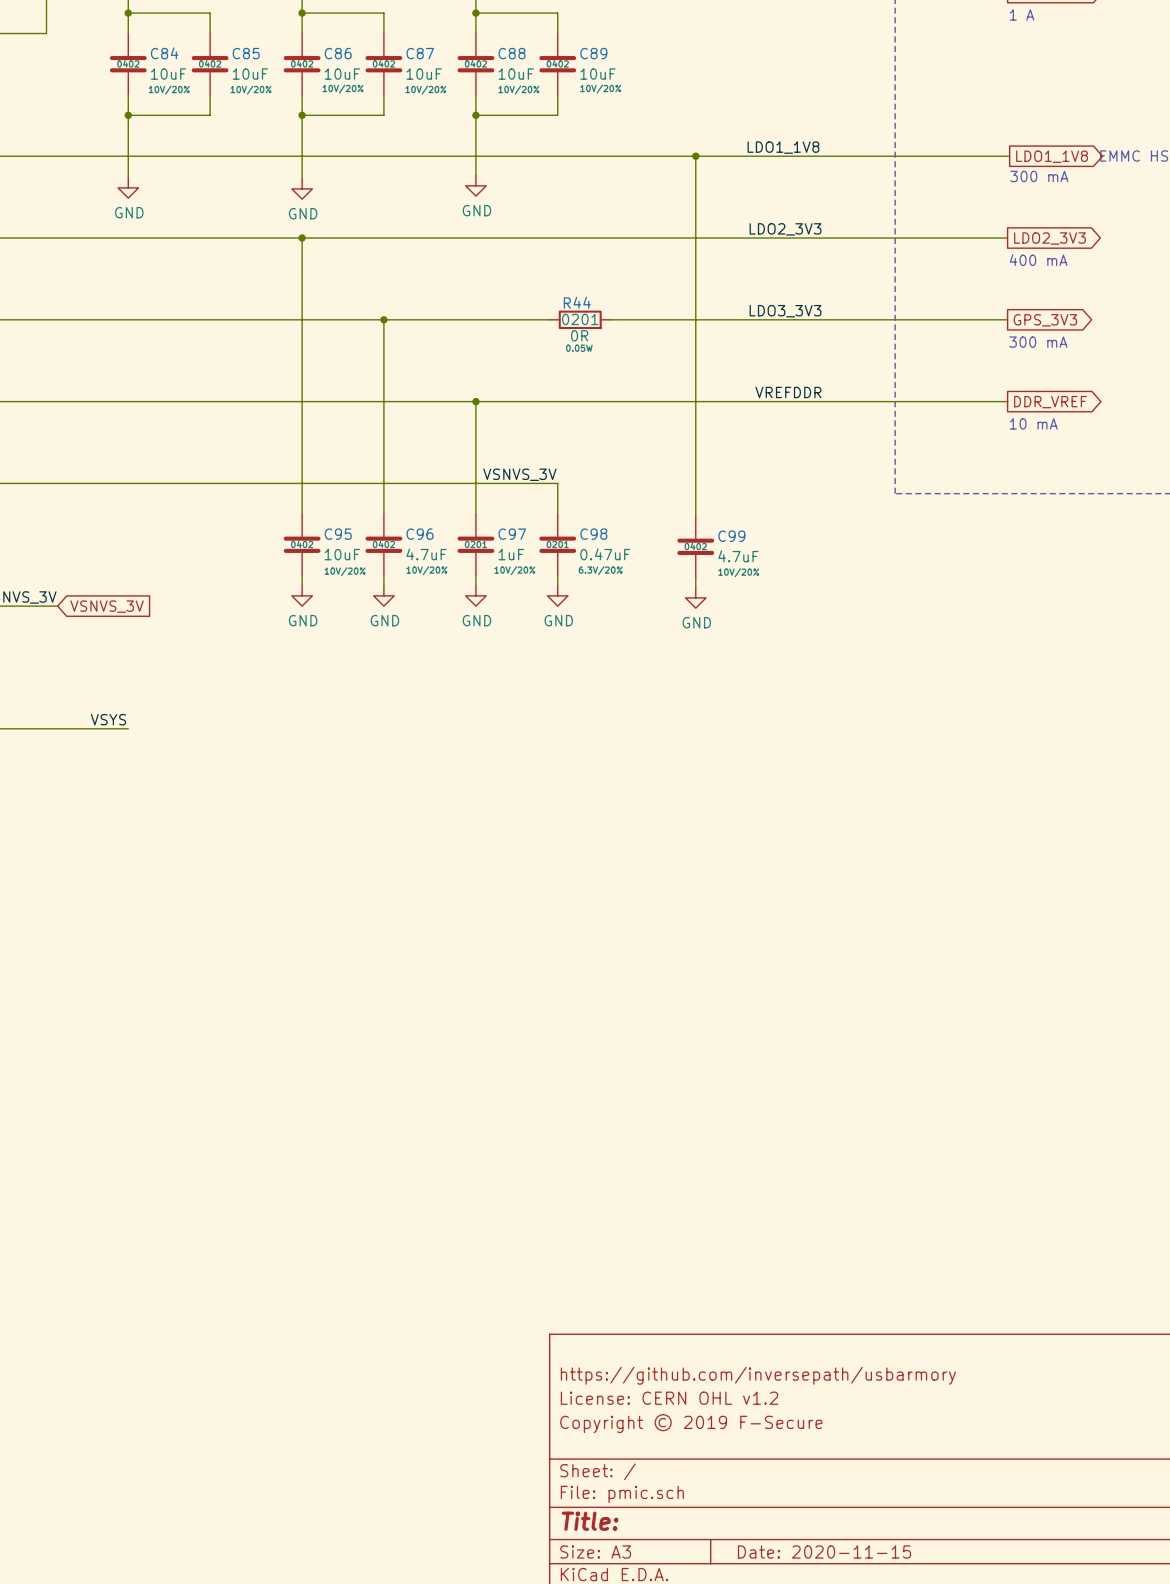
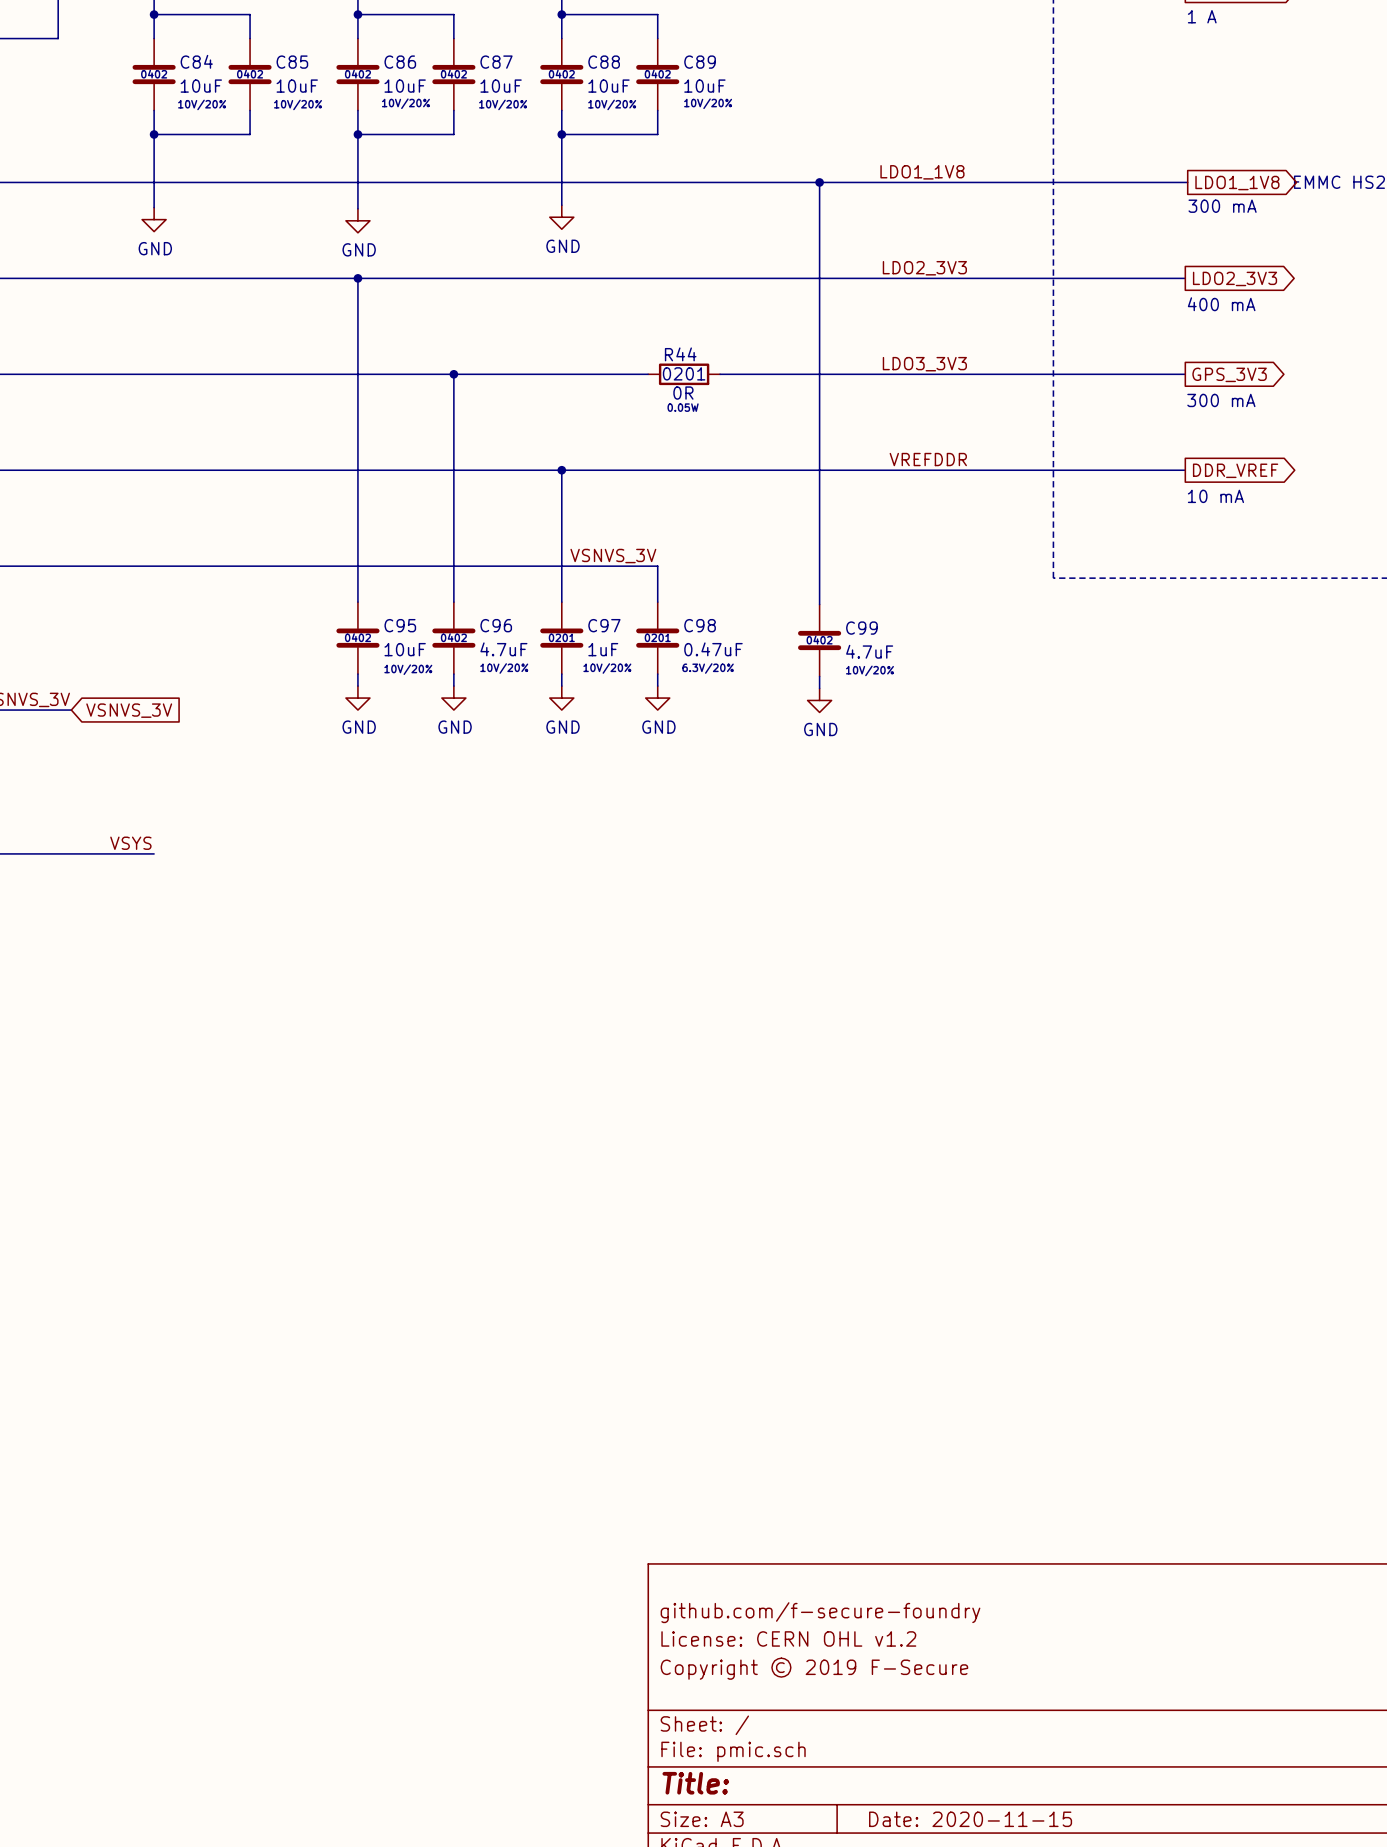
title block: https://github.com/inversepath/usbarmory (758, 1375) -> github.com/f-secure-foundry (820, 1612)

